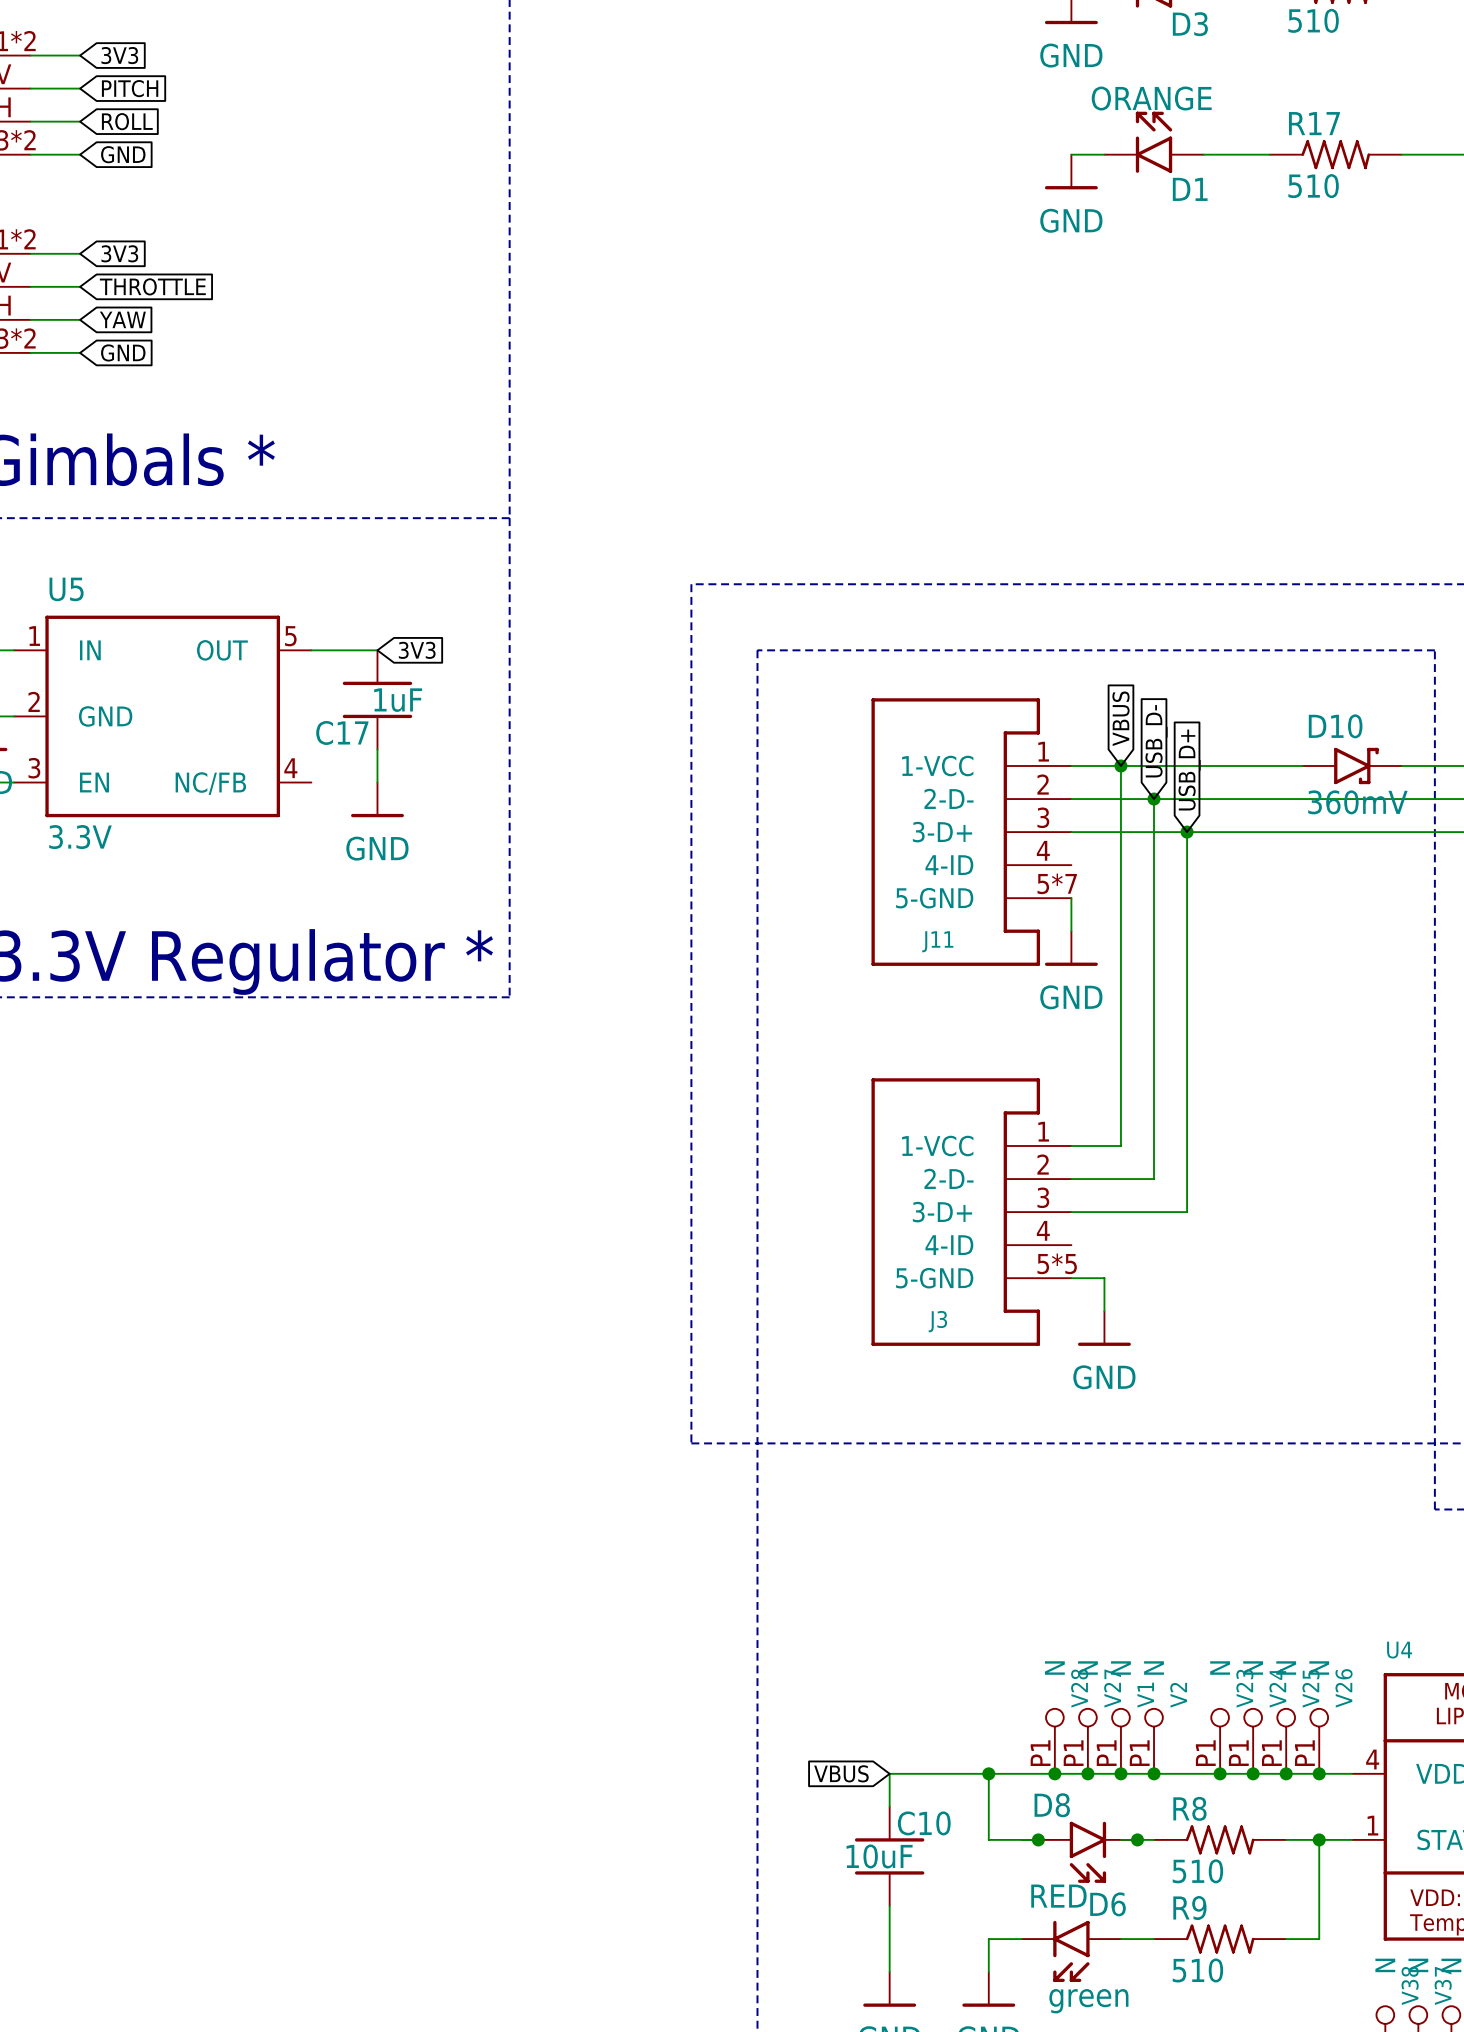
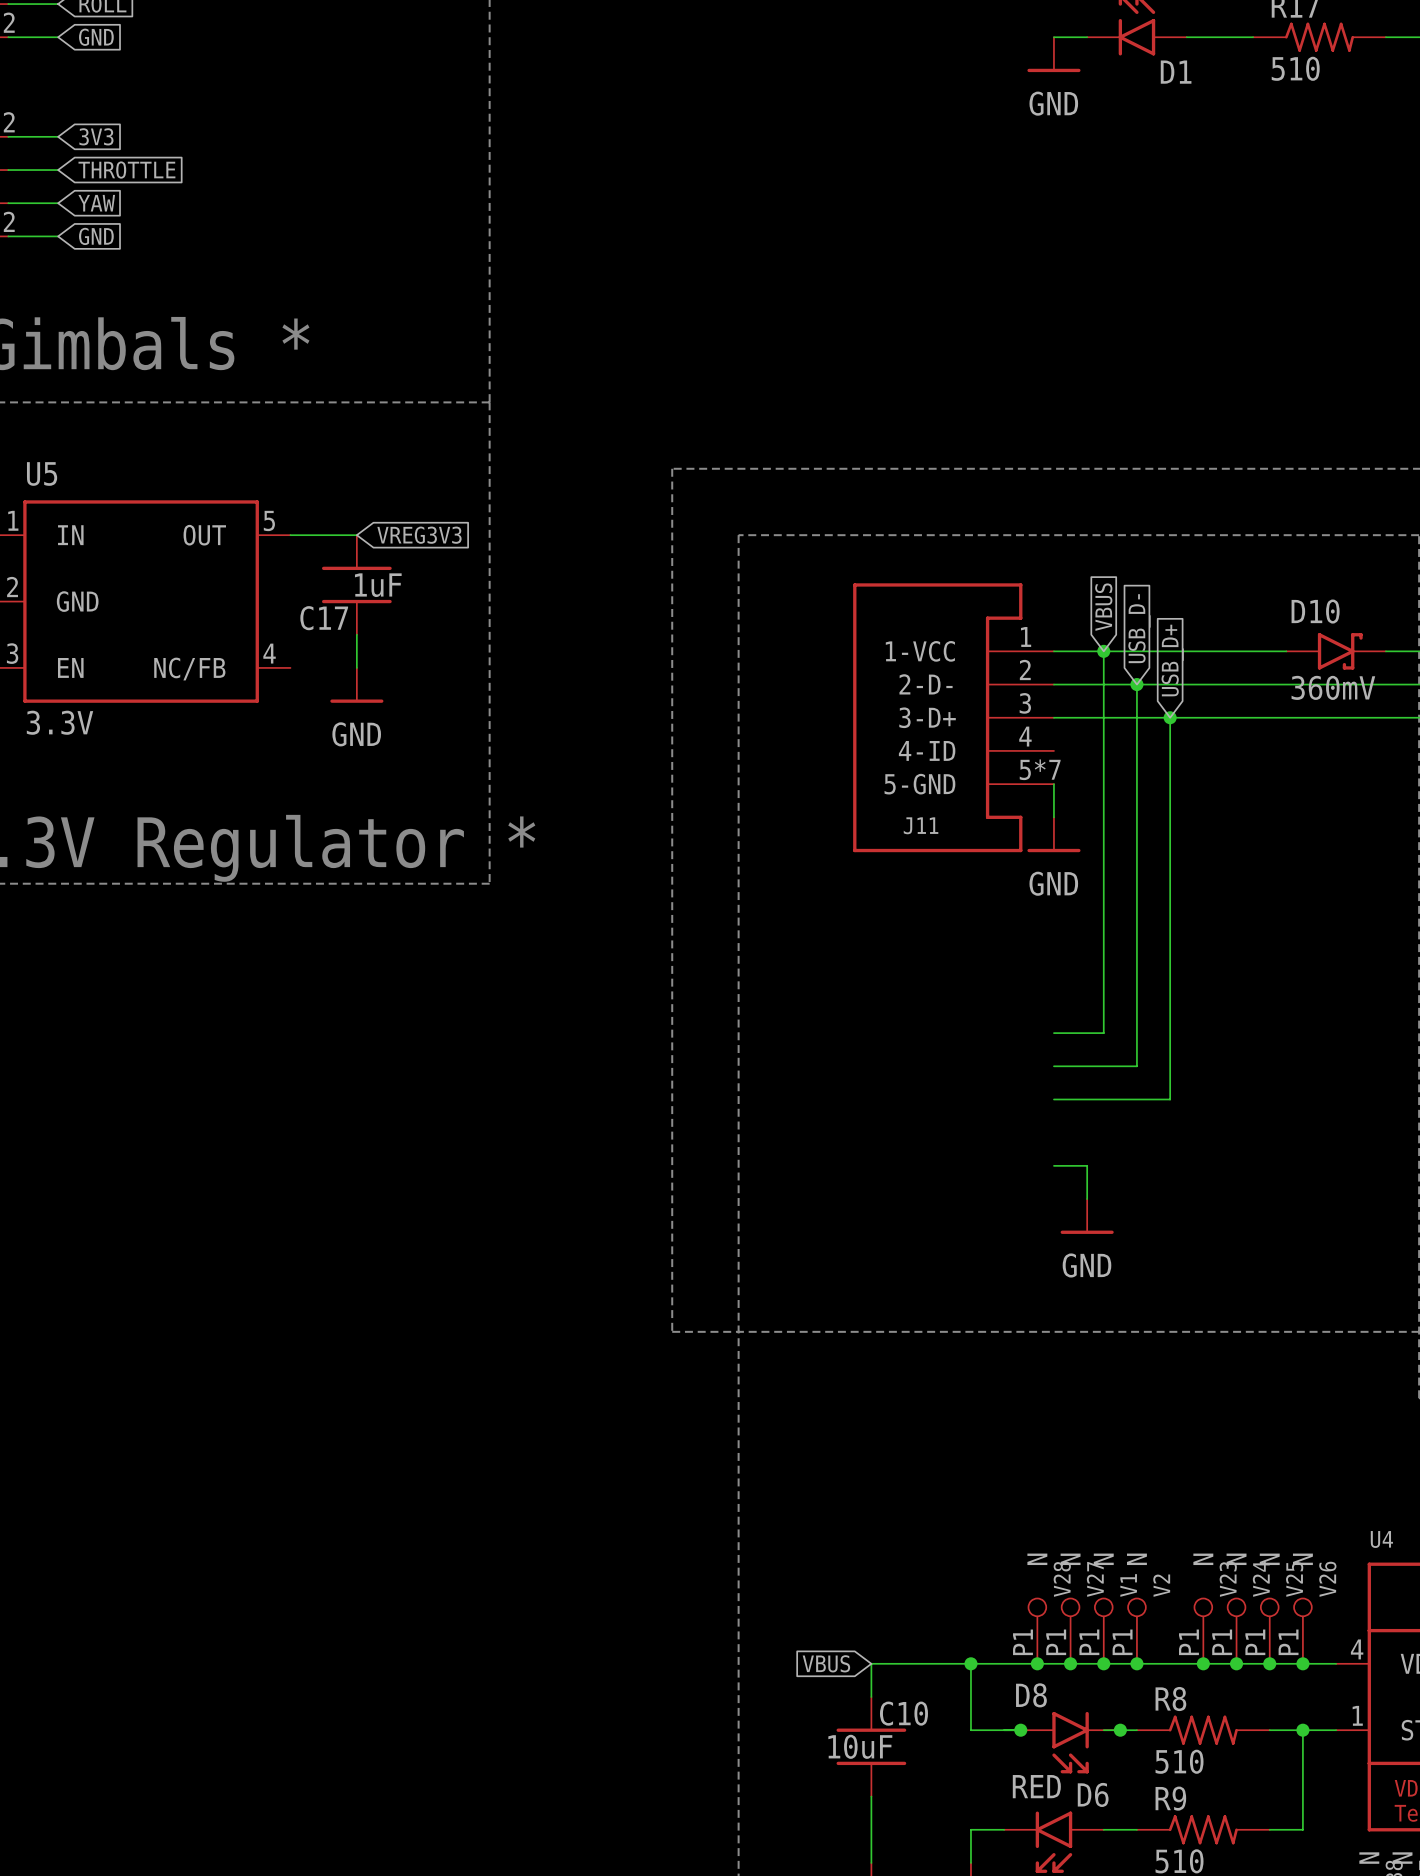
global label: 3V3 (417, 650) -> VREG3V3 (419, 535)
J3: (971, 1212) -> none

